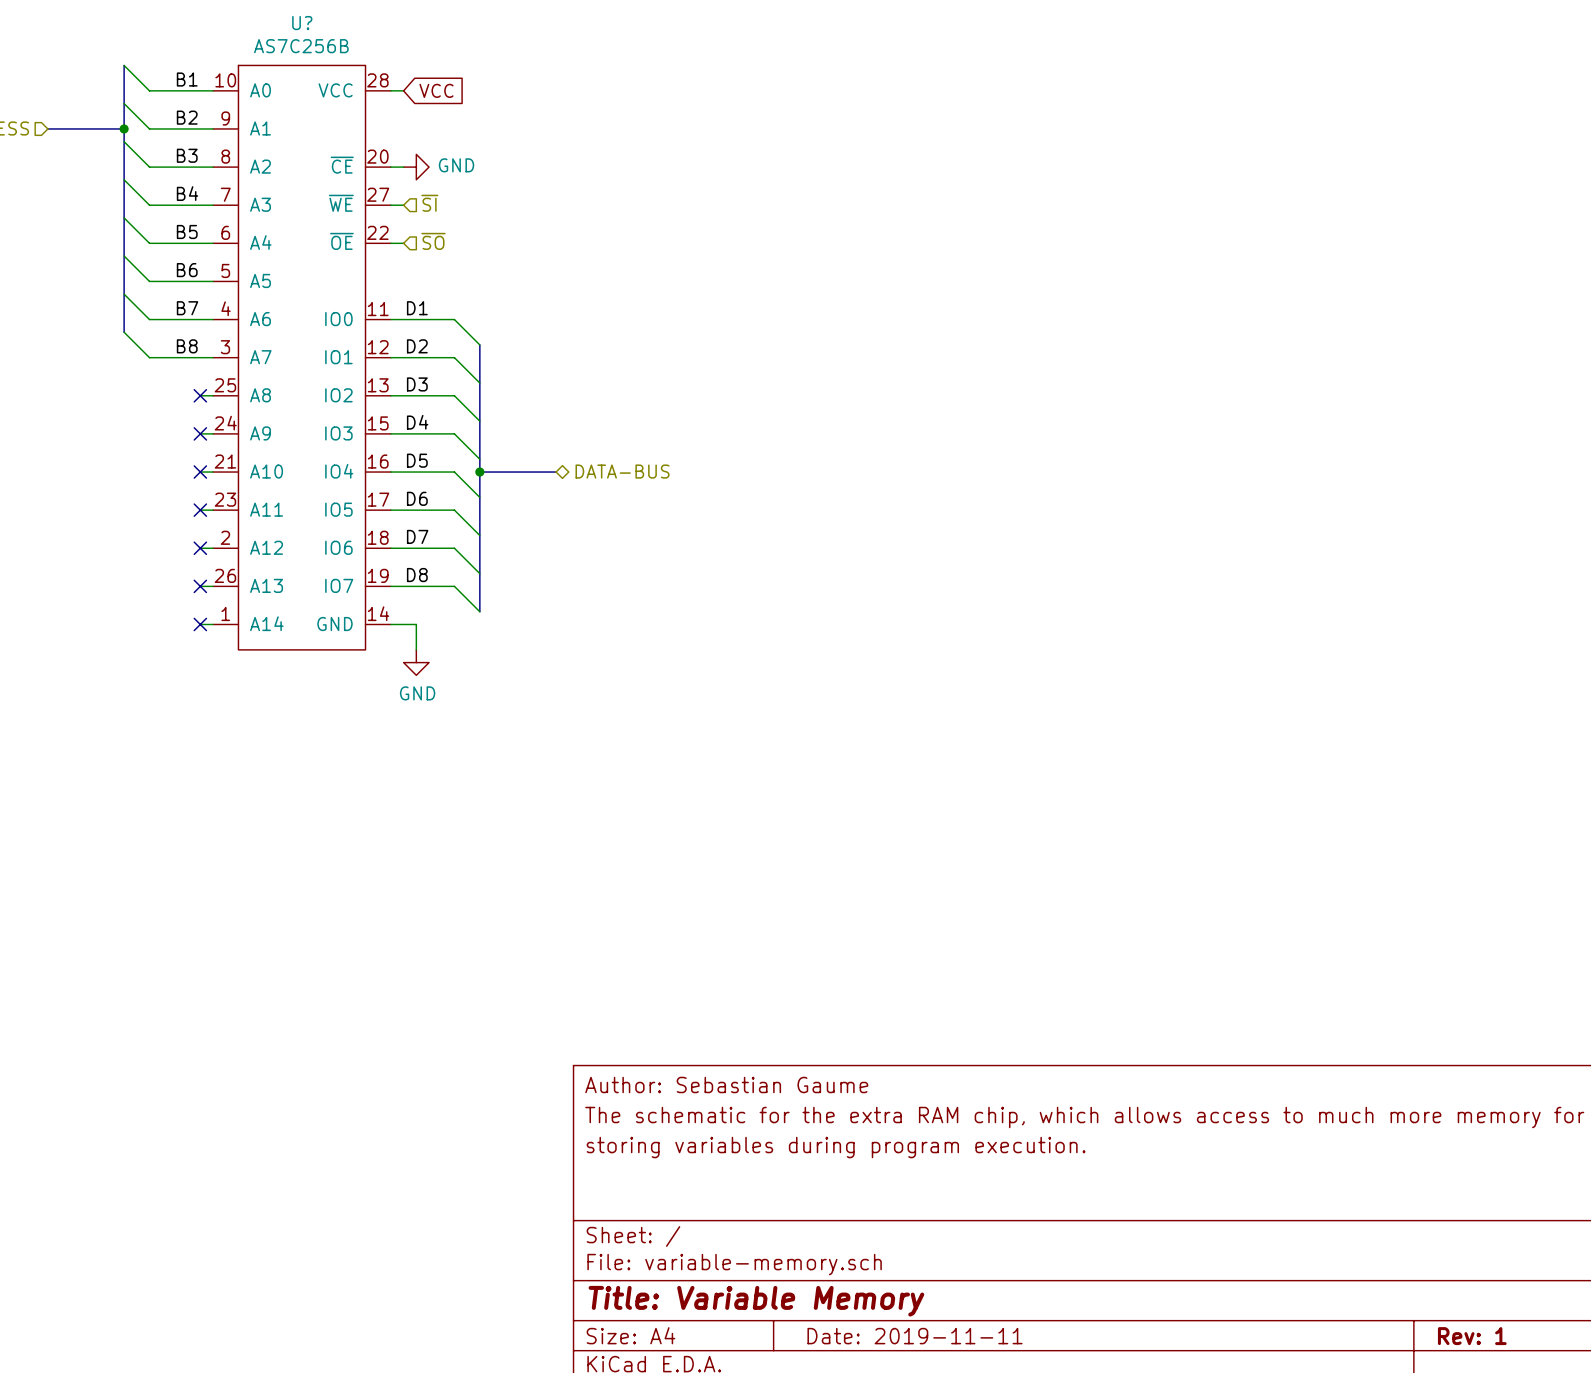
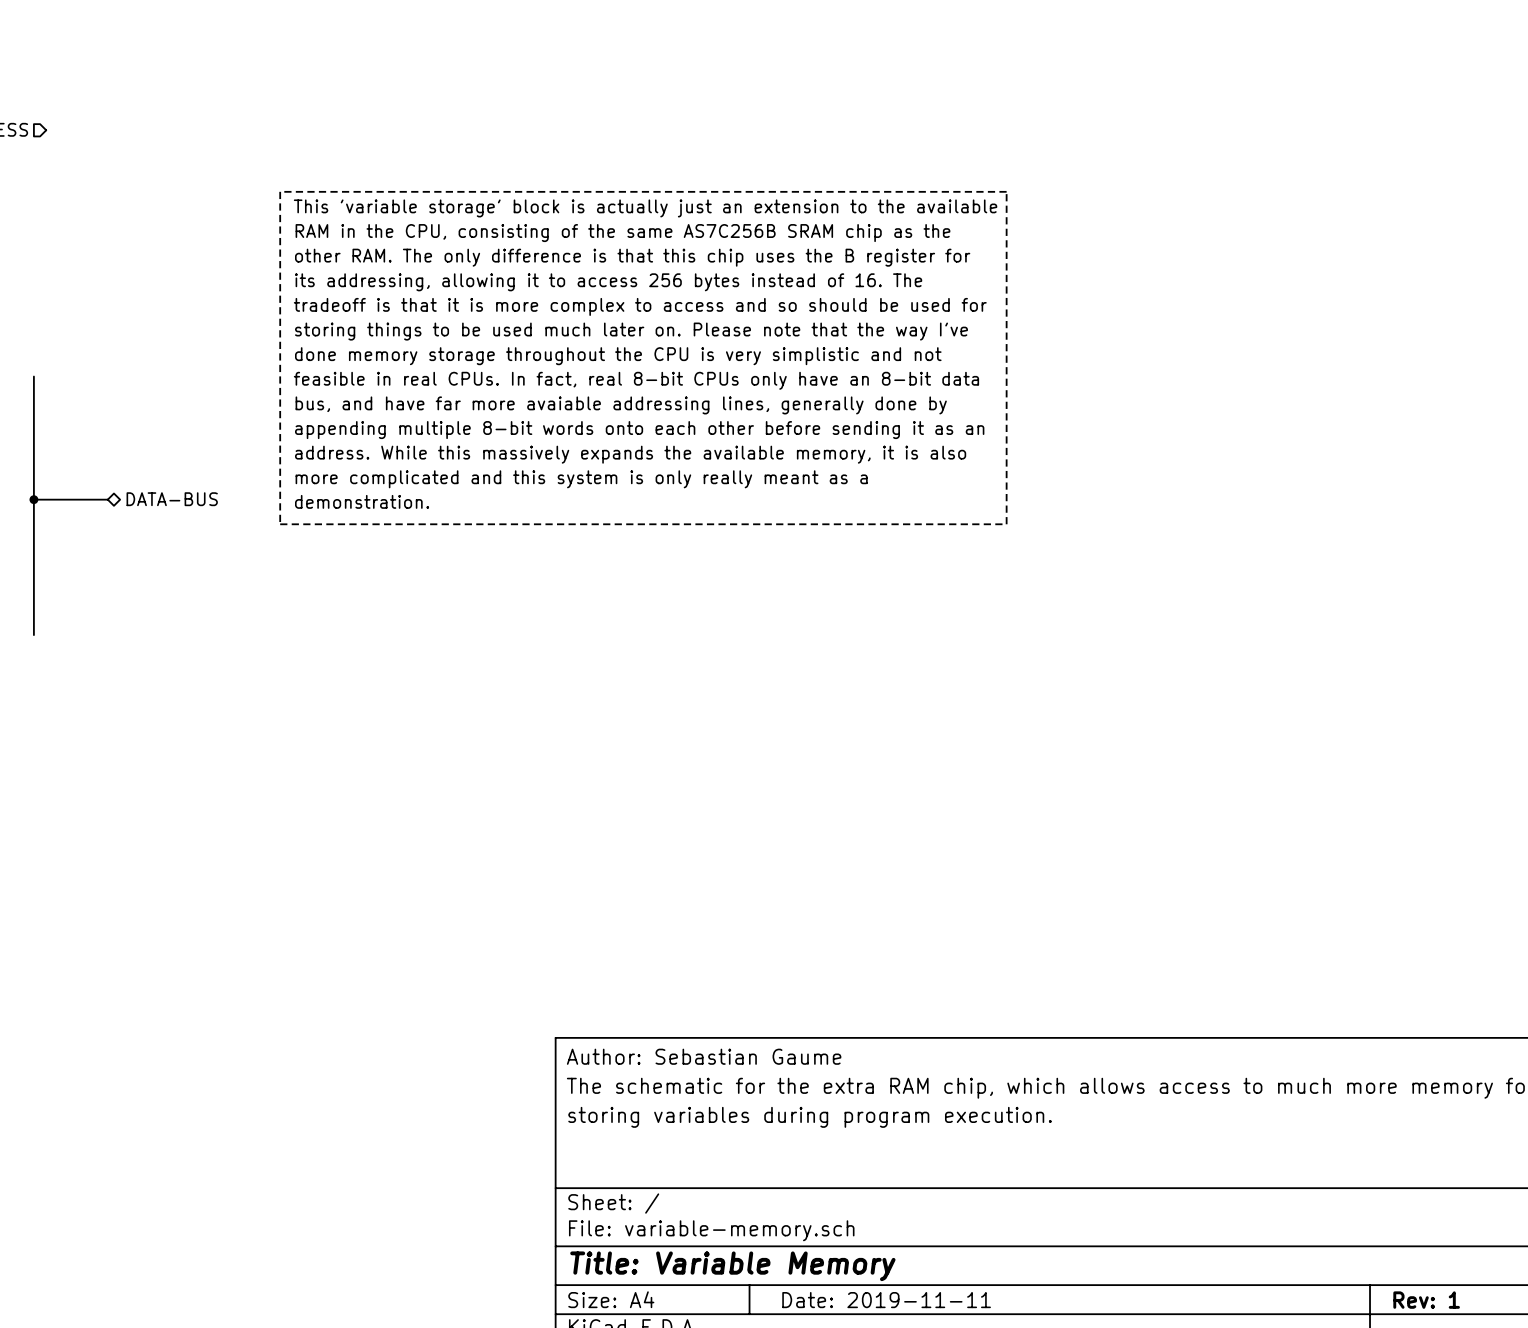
wire: (124, 65) (149, 90) (213, 90) -> none
bus: (124, 65) (124, 332) -> none
label: B1 (187, 79) -> none
wire: (390, 90) (403, 90) -> none
global label: VCC (436, 90) -> none
wire: (124, 103) (149, 128) (213, 128) -> none
label: B2 (187, 117) -> none
bus: (47, 128) (124, 128) -> none
junction: (124, 128) -> none
wire: (124, 141) (149, 167) (213, 167) -> none
label: B3 (187, 155) -> none
wire: (390, 167) (403, 167) -> none
power symbol: GND (416, 167) -> none
wire: (124, 179) (149, 205) (213, 205) -> none
line: none -> (280, 191) (280, 524) (1006, 524) (1006, 191) (280, 191)
label: B4 (187, 193) -> none
hierarchical label: ~{SI} (429, 203) -> none
wire: (390, 205) (403, 205) -> none
text: none -> This 'variable storage' block is actually just an extension to the available (645, 208)
wire: (124, 217) (149, 243) (213, 243) -> none
label: B5 (187, 231) -> none
text: none -> RAM in the CPU, consisting of the same AS7C256B SRAM chip as the (622, 233)
hierarchical label: ~{SO} (433, 241) -> none
wire: (390, 243) (403, 243) -> none
wire: (124, 256) (149, 281) (213, 281) -> none
text: none -> other RAM. The only difference is that this chip uses the B register for (632, 257)
label: B6 (187, 270) -> none
text: none -> its addressing, allowing it to access 256 bytes instead of 16. The (608, 282)
wire: (124, 294) (149, 319) (213, 319) -> none
label: B7 (187, 308) -> none
label: D1 (417, 308) -> none
text: none -> tradeoff is that it is more complex to access and so should be used for (640, 306)
wire: (390, 319) (454, 319) (479, 344) -> none
wire: (124, 332) (149, 357) (213, 357) -> none
text: none -> storing things to be used much later on. Please note that the way I've (631, 331)
bus: (479, 344) (479, 611) -> none
label: B8 (187, 346) -> none
label: D2 (417, 346) -> none
U?: AS7C256B (301, 357) -> none
wire: (390, 357) (454, 357) (479, 383) -> none
text: none -> done memory storage throughout the CPU is very simplistic and not (618, 356)
bus: none -> (33, 376) (33, 635)
label: D3 (417, 384) -> none
text: none -> feasible in real CPUs. In fact, real 8-bit CPUs only have an 8-bit data (636, 380)
wire: (200, 395) (213, 395) -> none
no-connect mark: (200, 395) -> none
wire: (390, 395) (454, 395) (479, 421) -> none
text: none -> bus, and have far more avaiable addressing lines, generally done by (621, 405)
label: D4 (417, 422) -> none
wire: (200, 433) (213, 433) -> none
no-connect mark: (200, 433) -> none
wire: (390, 433) (454, 433) (479, 459) -> none
text: none -> appending multiple 8-bit words onto each other before sending it as an (639, 430)
label: D5 (417, 460) -> none
text: none -> address. While this massively expands the available memory, it is also (630, 454)
hierarchical label: DATA-BUS (622, 471) -> none
wire: (200, 472) (213, 472) -> none
no-connect mark: (200, 472) -> none
wire: (390, 472) (454, 472) (479, 497) -> none
bus: (479, 472) (556, 472) -> none
junction: (479, 472) -> none
text: none -> more complicated and this system is only really meant as a (581, 479)
label: D6 (417, 498) -> none
hierarchical label: none -> DATA-BUS (172, 499)
bus: none -> (33, 499) (107, 499)
junction: none -> (33, 499)
wire: (200, 510) (213, 510) -> none
no-connect mark: (200, 510) -> none
wire: (390, 510) (454, 510) (479, 535) -> none
text: none -> demonstration. (362, 501)
label: D7 (417, 536) -> none
wire: (200, 548) (213, 548) -> none
no-connect mark: (200, 548) -> none
wire: (390, 548) (454, 548) (479, 573) -> none
label: D8 (417, 575) -> none
wire: (200, 586) (213, 586) -> none
no-connect mark: (200, 586) -> none
wire: (390, 586) (454, 586) (479, 611) -> none
wire: (200, 624) (213, 624) -> none
no-connect mark: (200, 624) -> none
wire: (390, 624) (416, 624) (416, 649) -> none
power symbol: GND (416, 662) -> none

